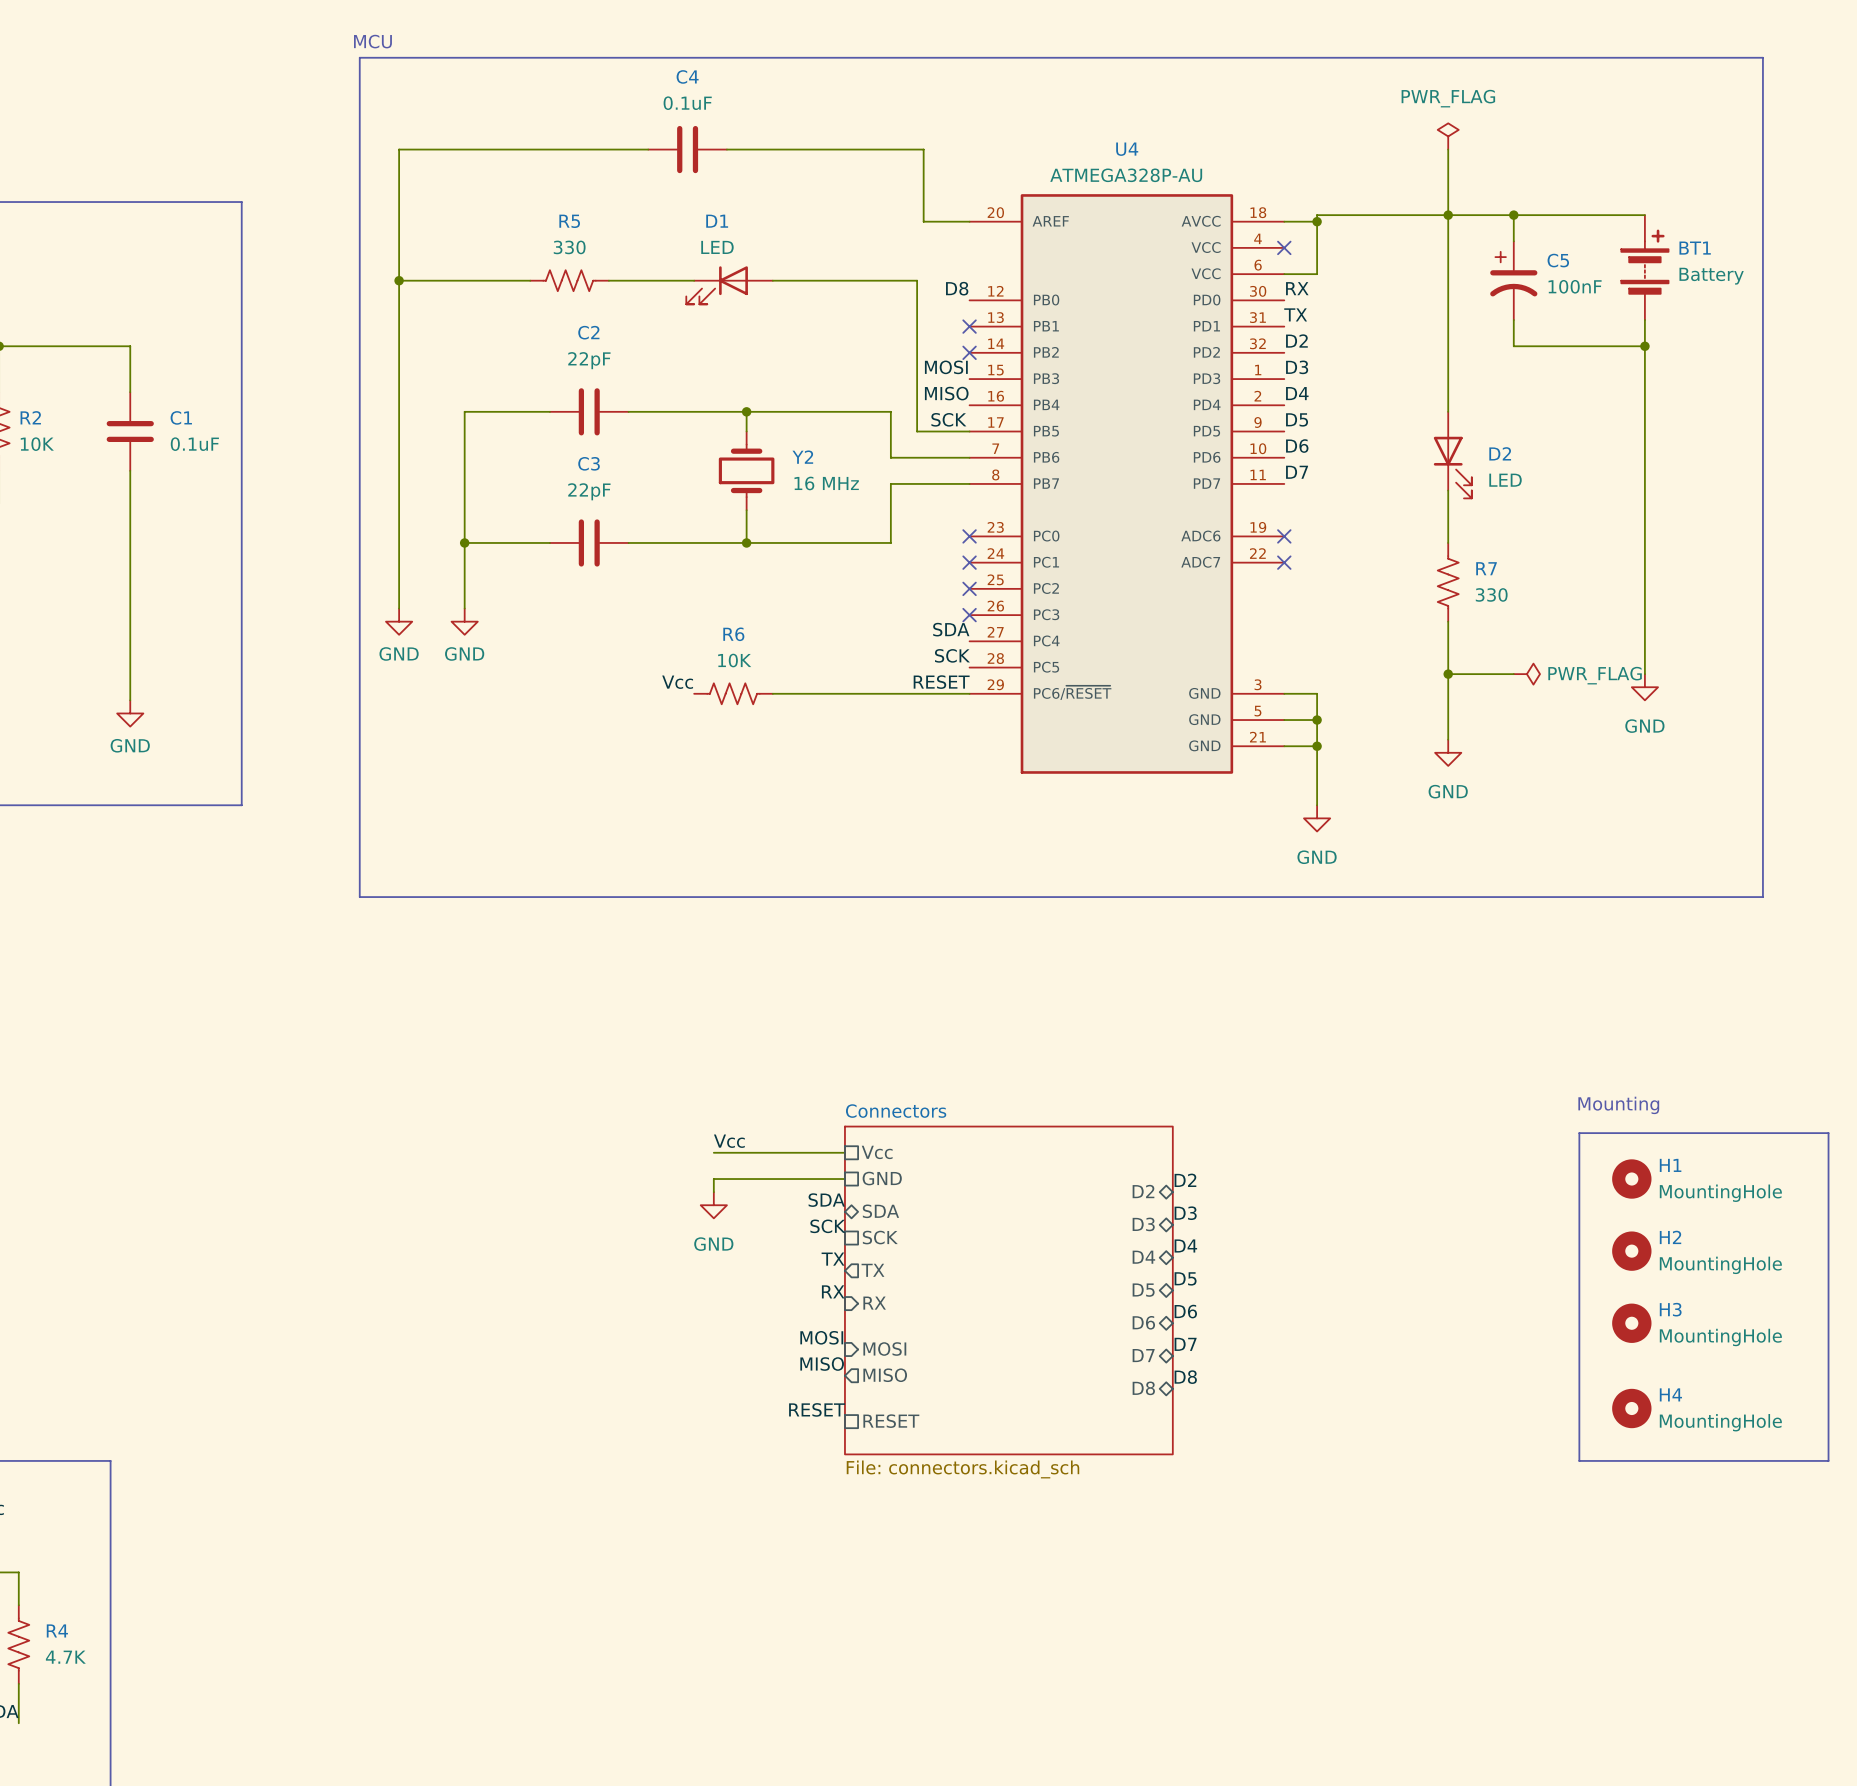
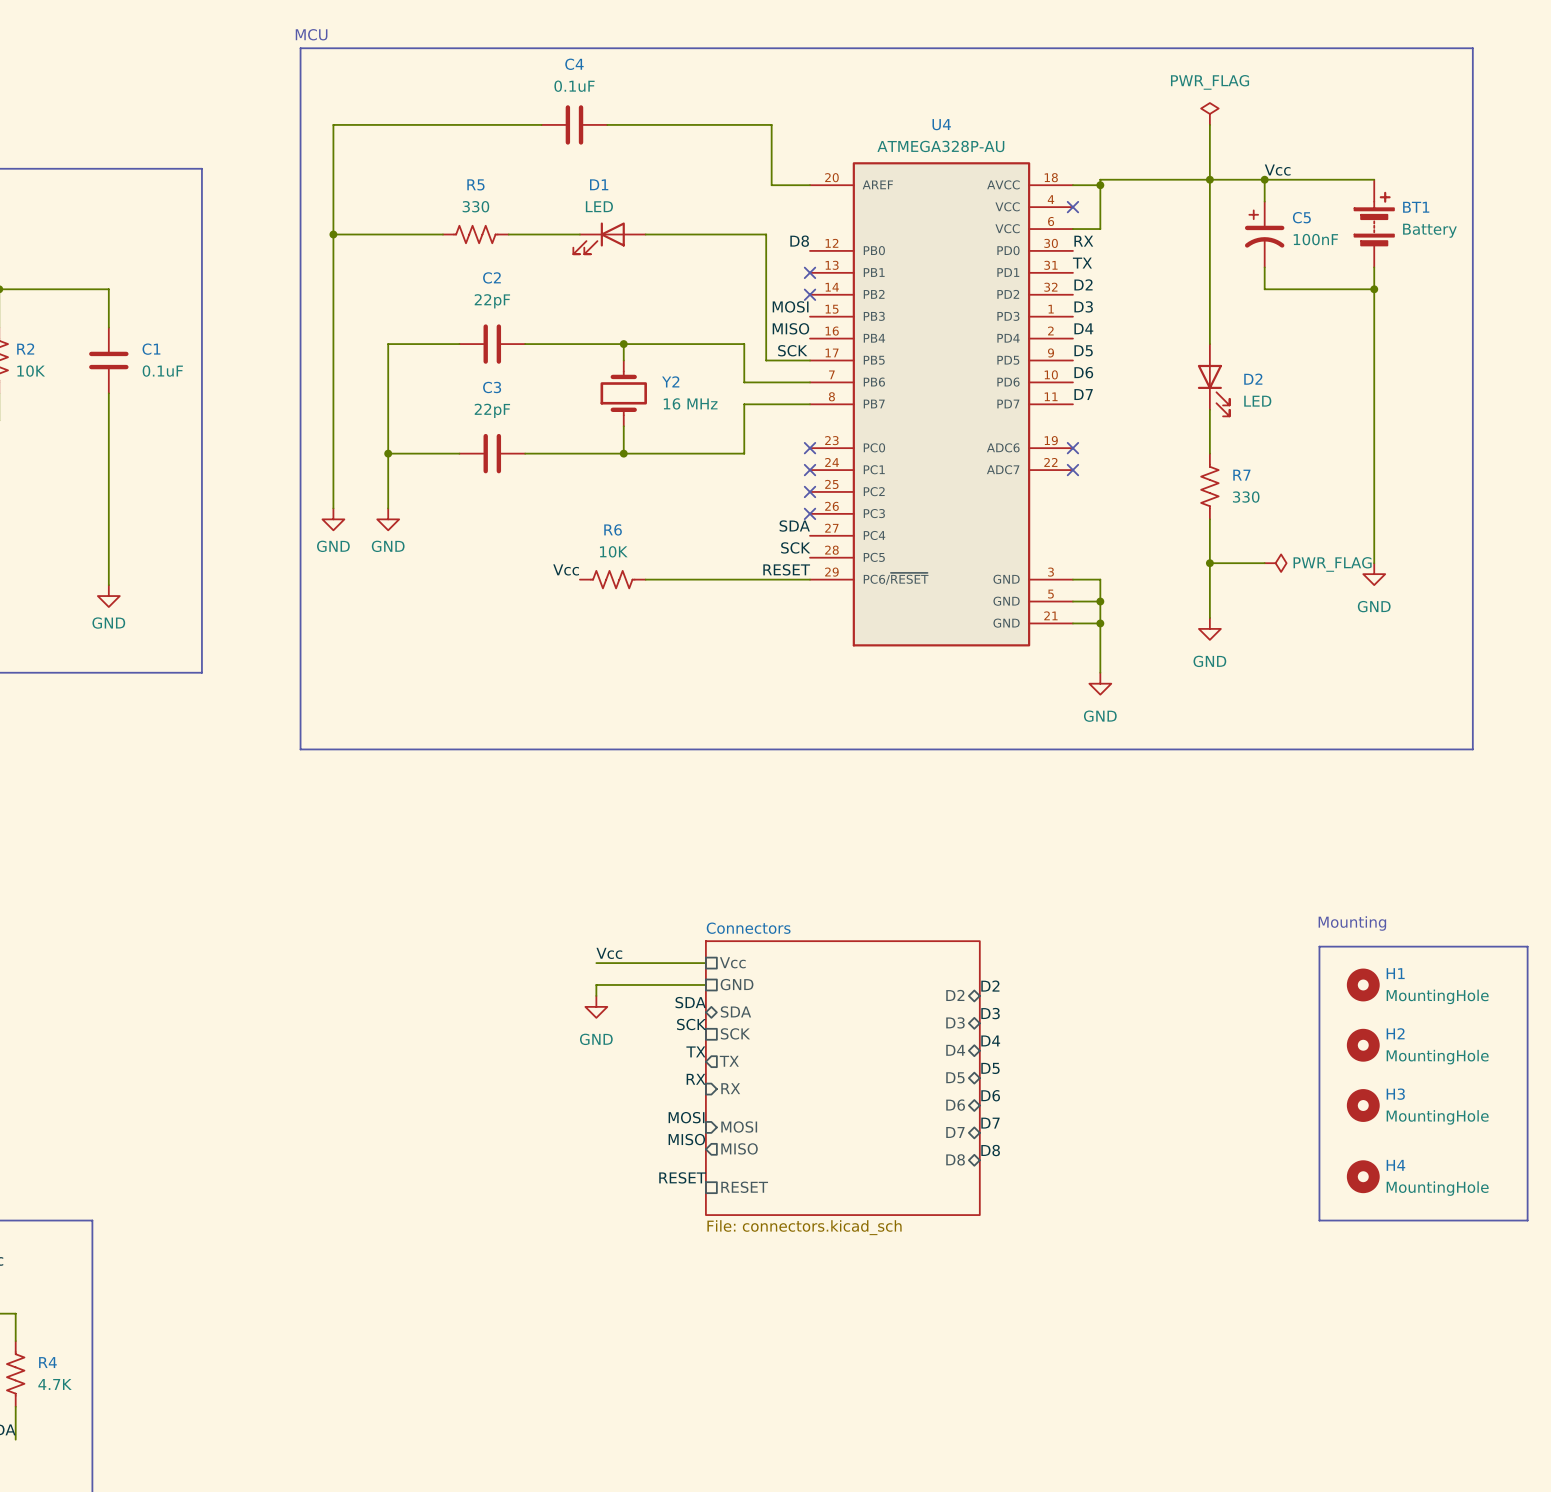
label: none -> Vcc (1277, 170)

